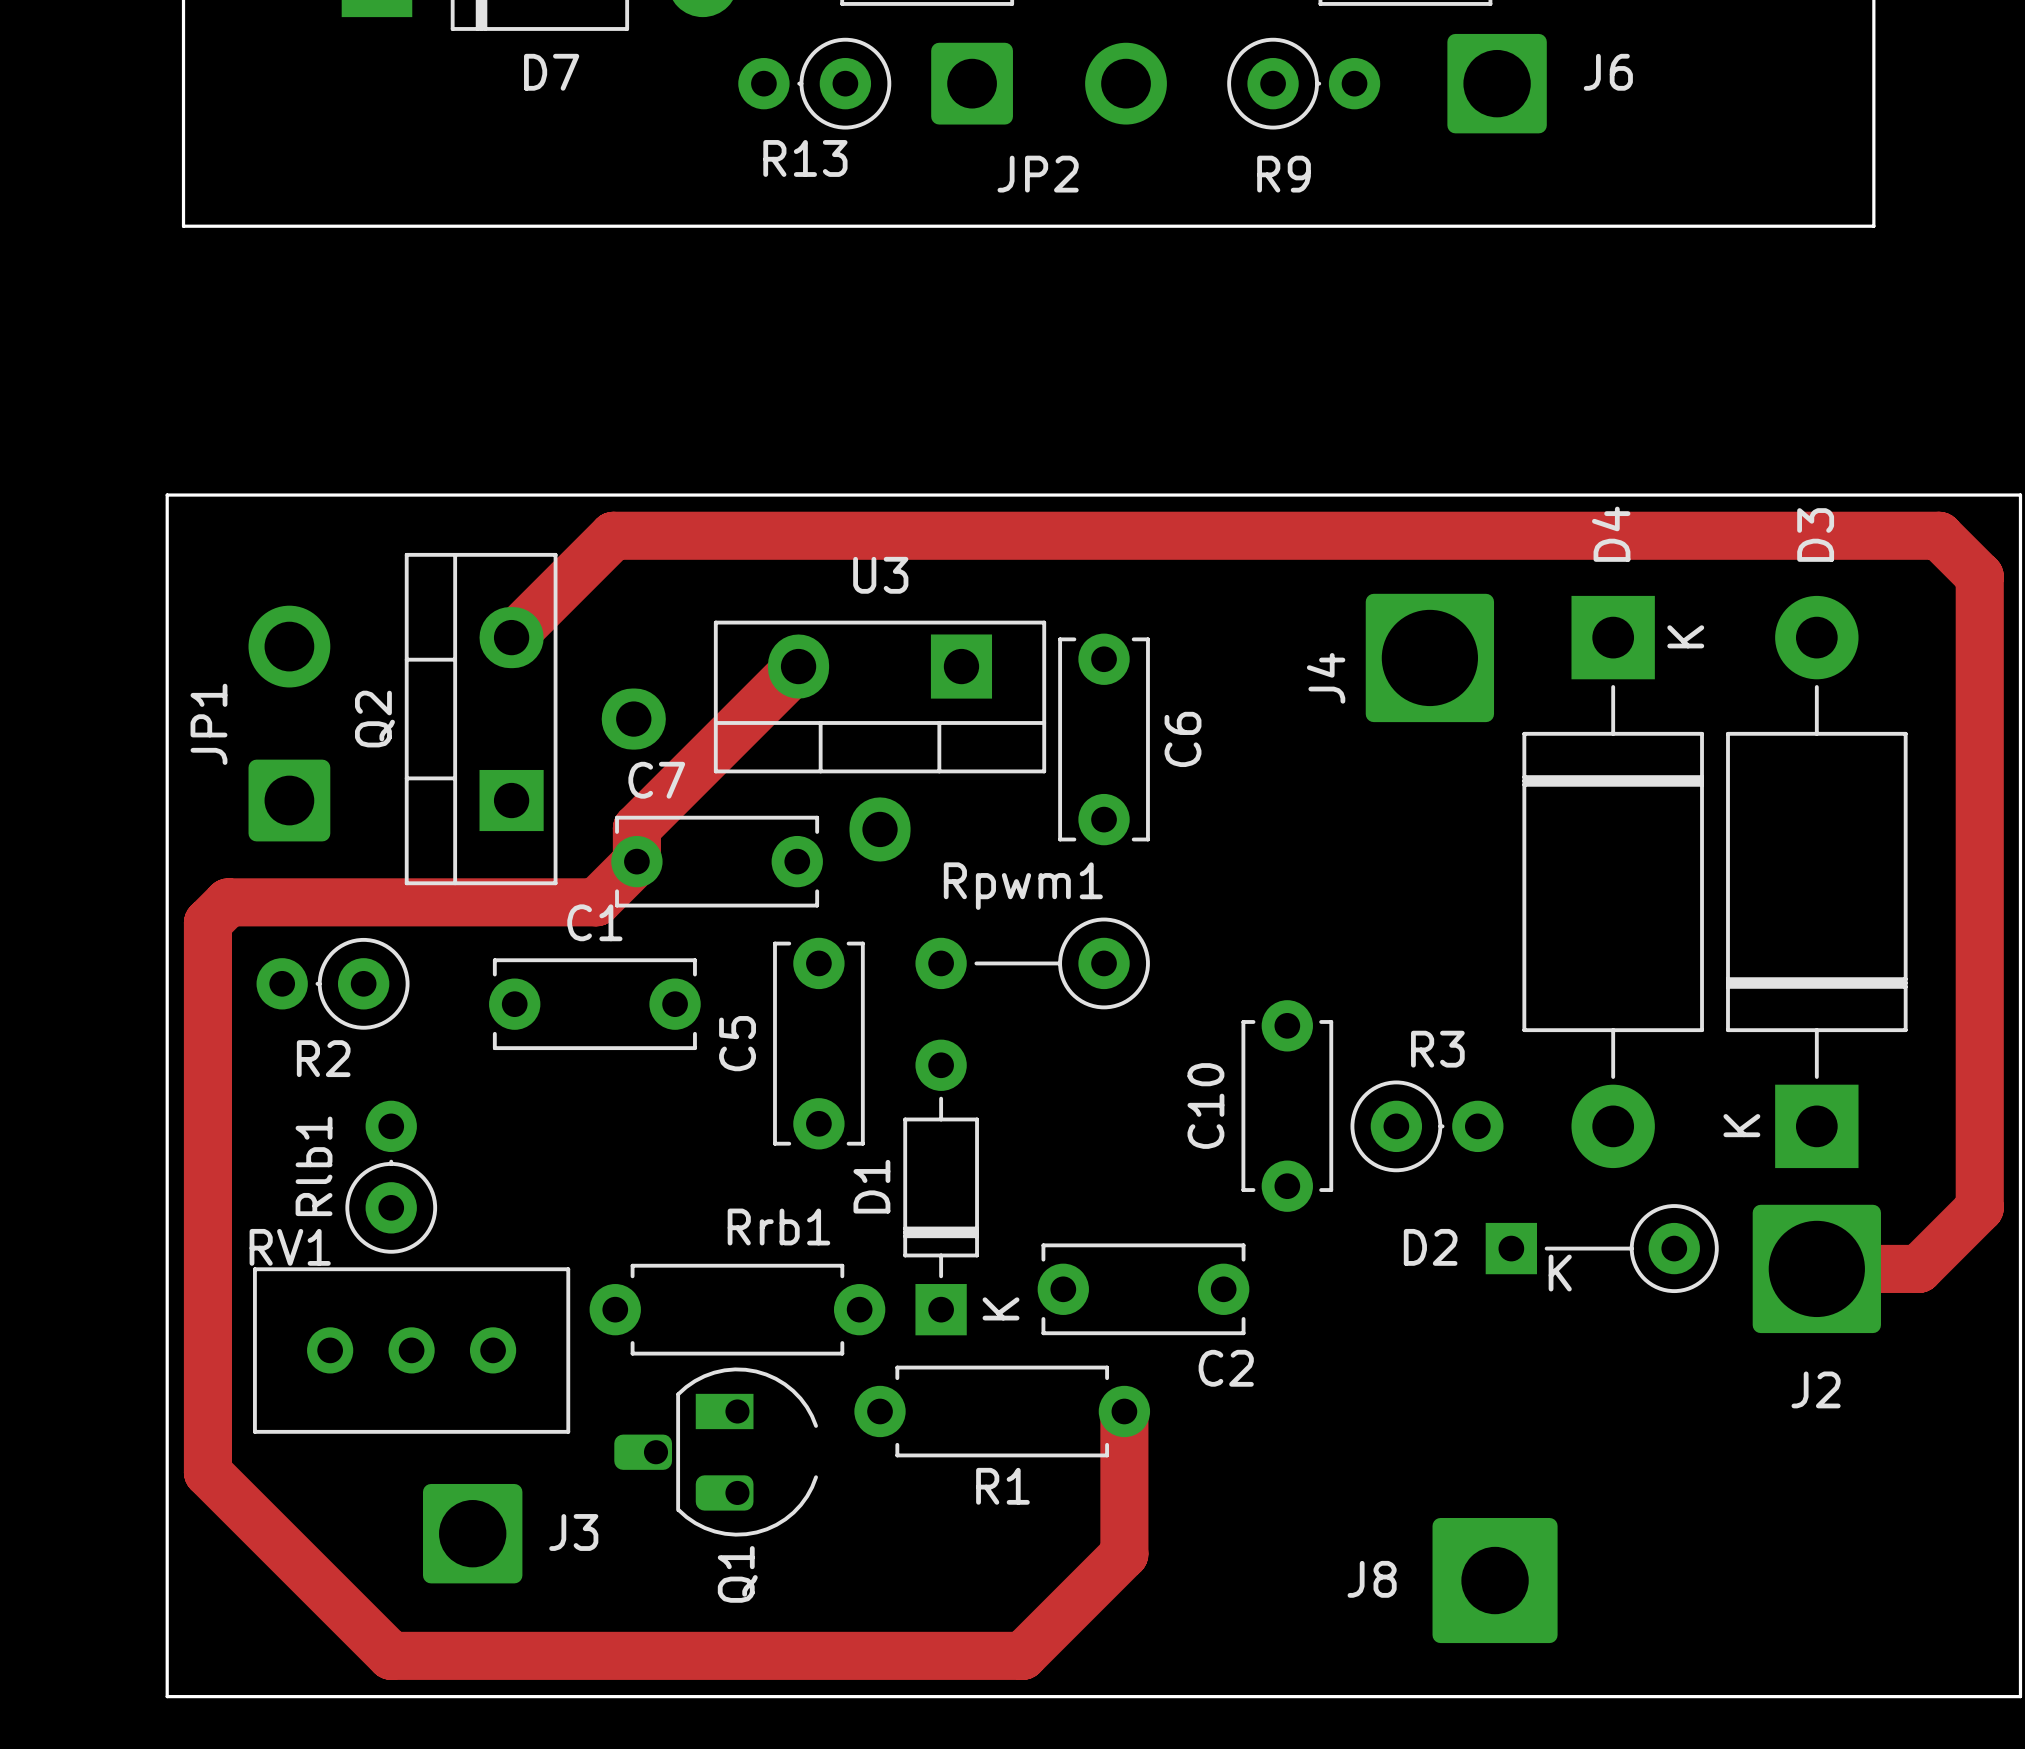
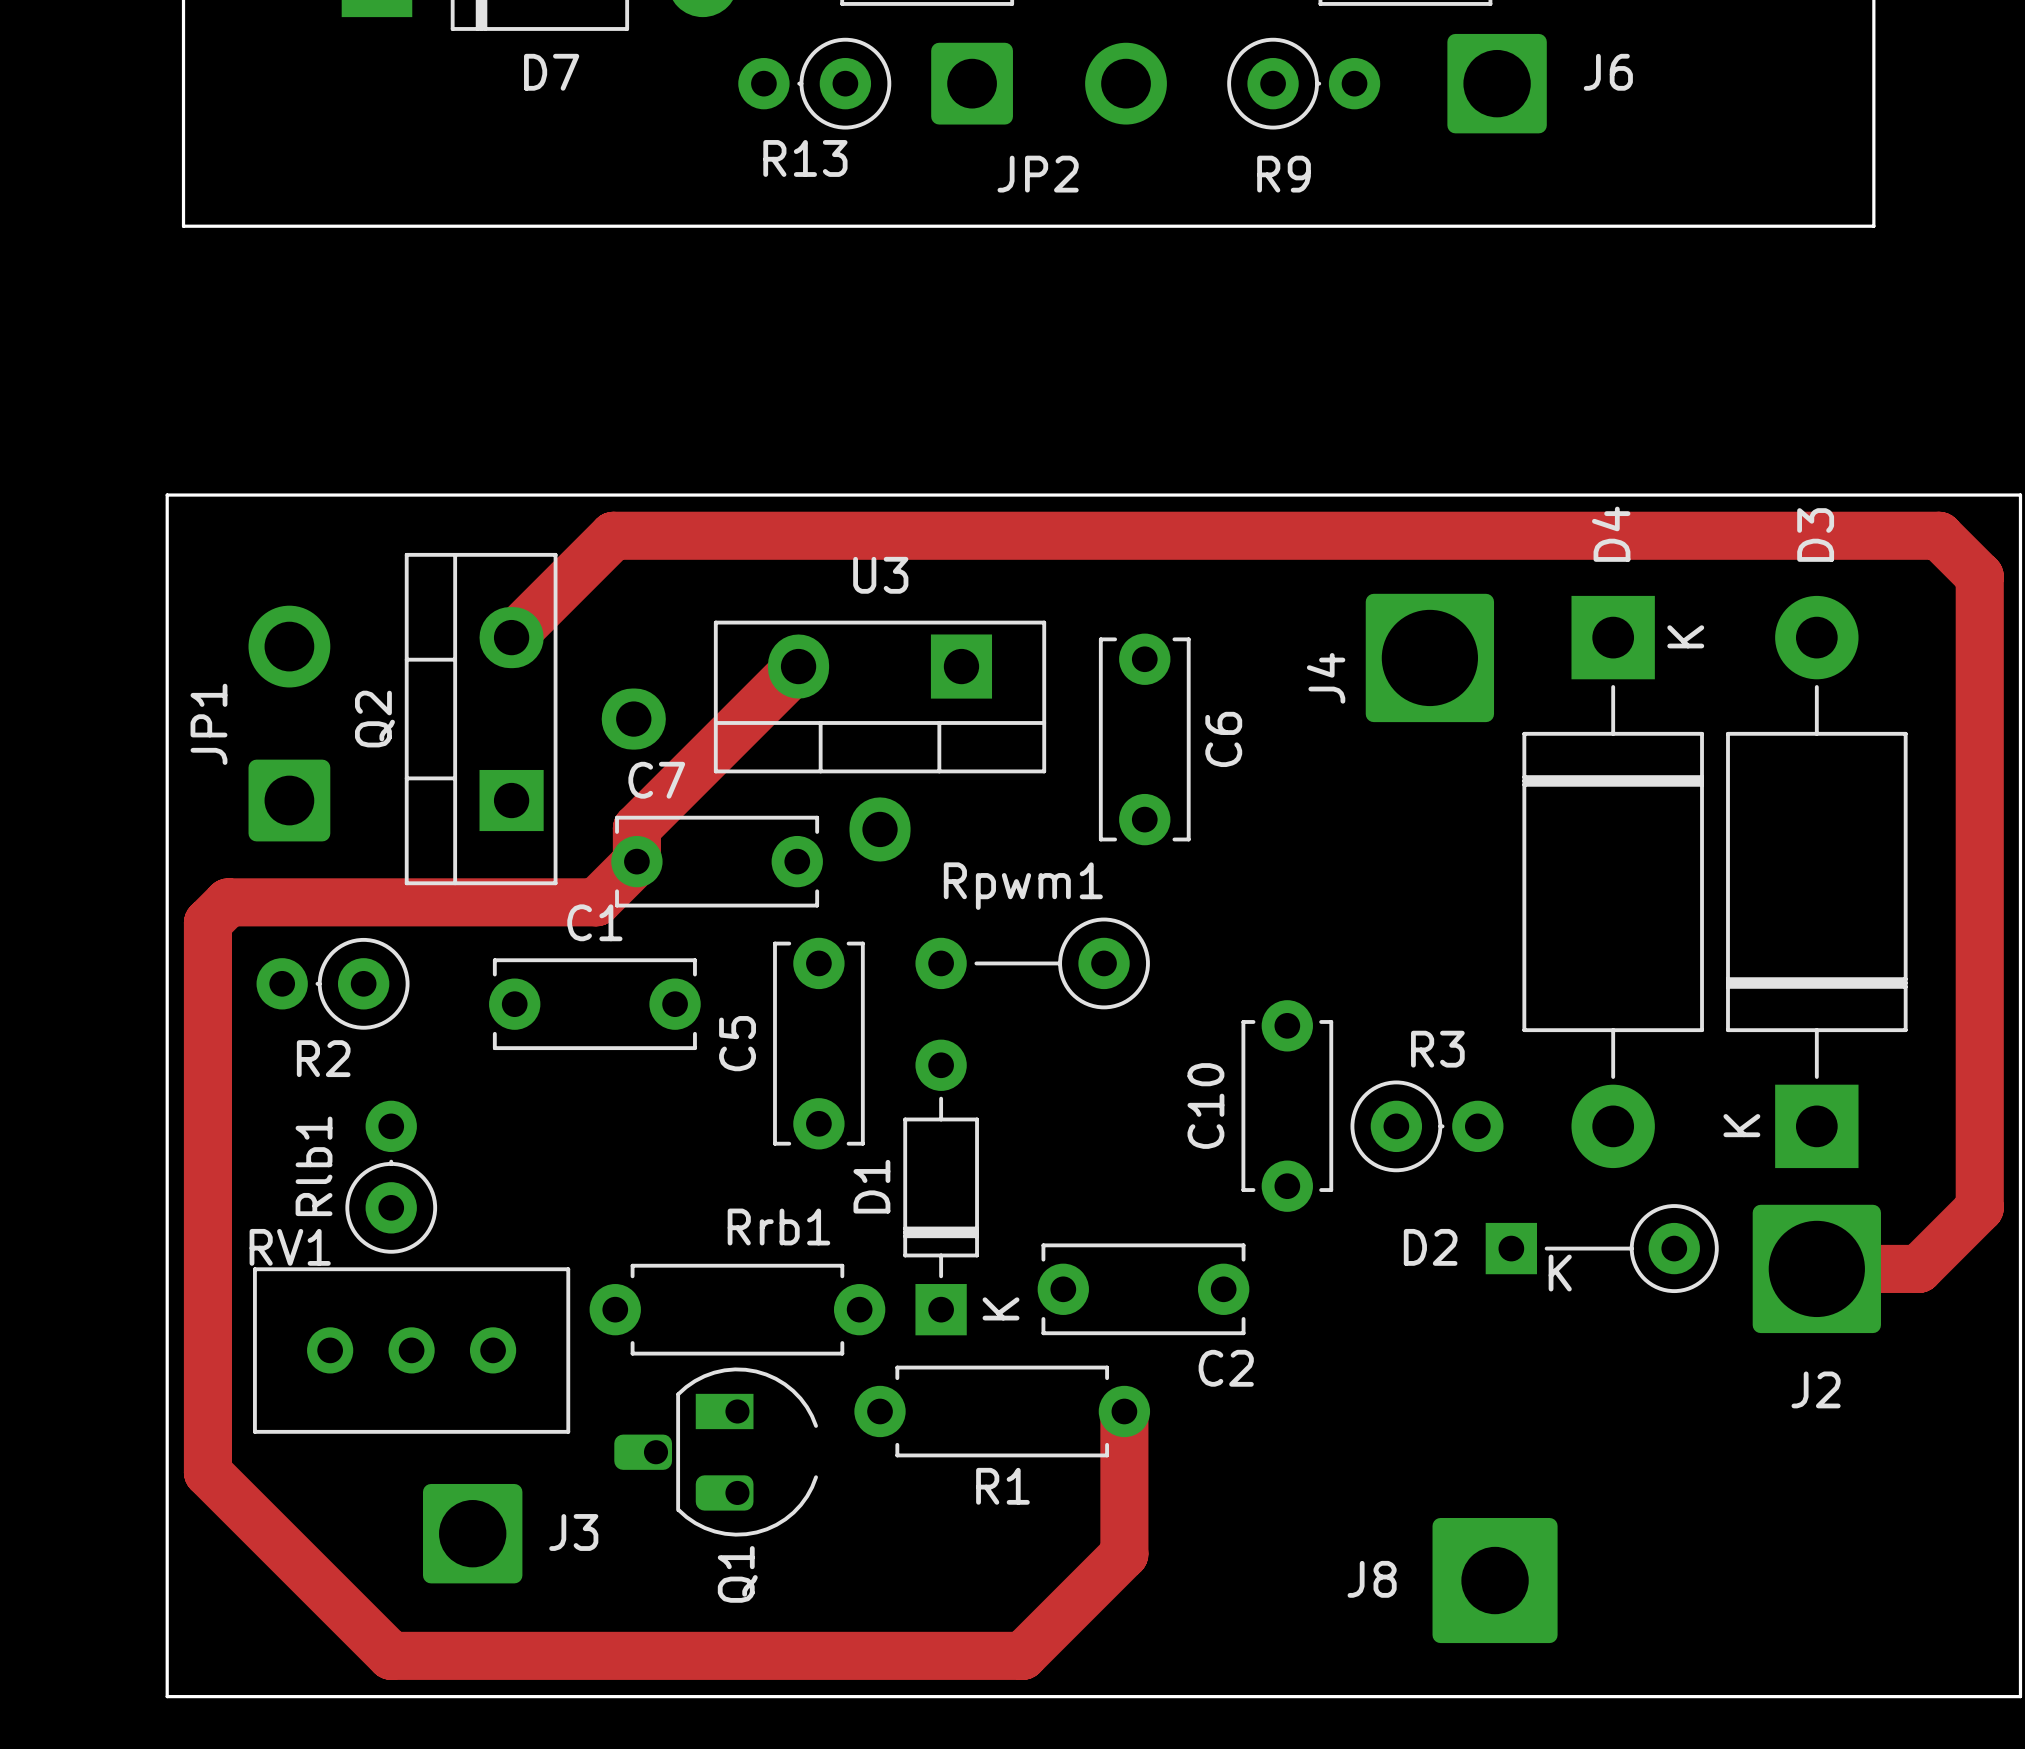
C6 position: (1104, 739) -> (1144, 739)

